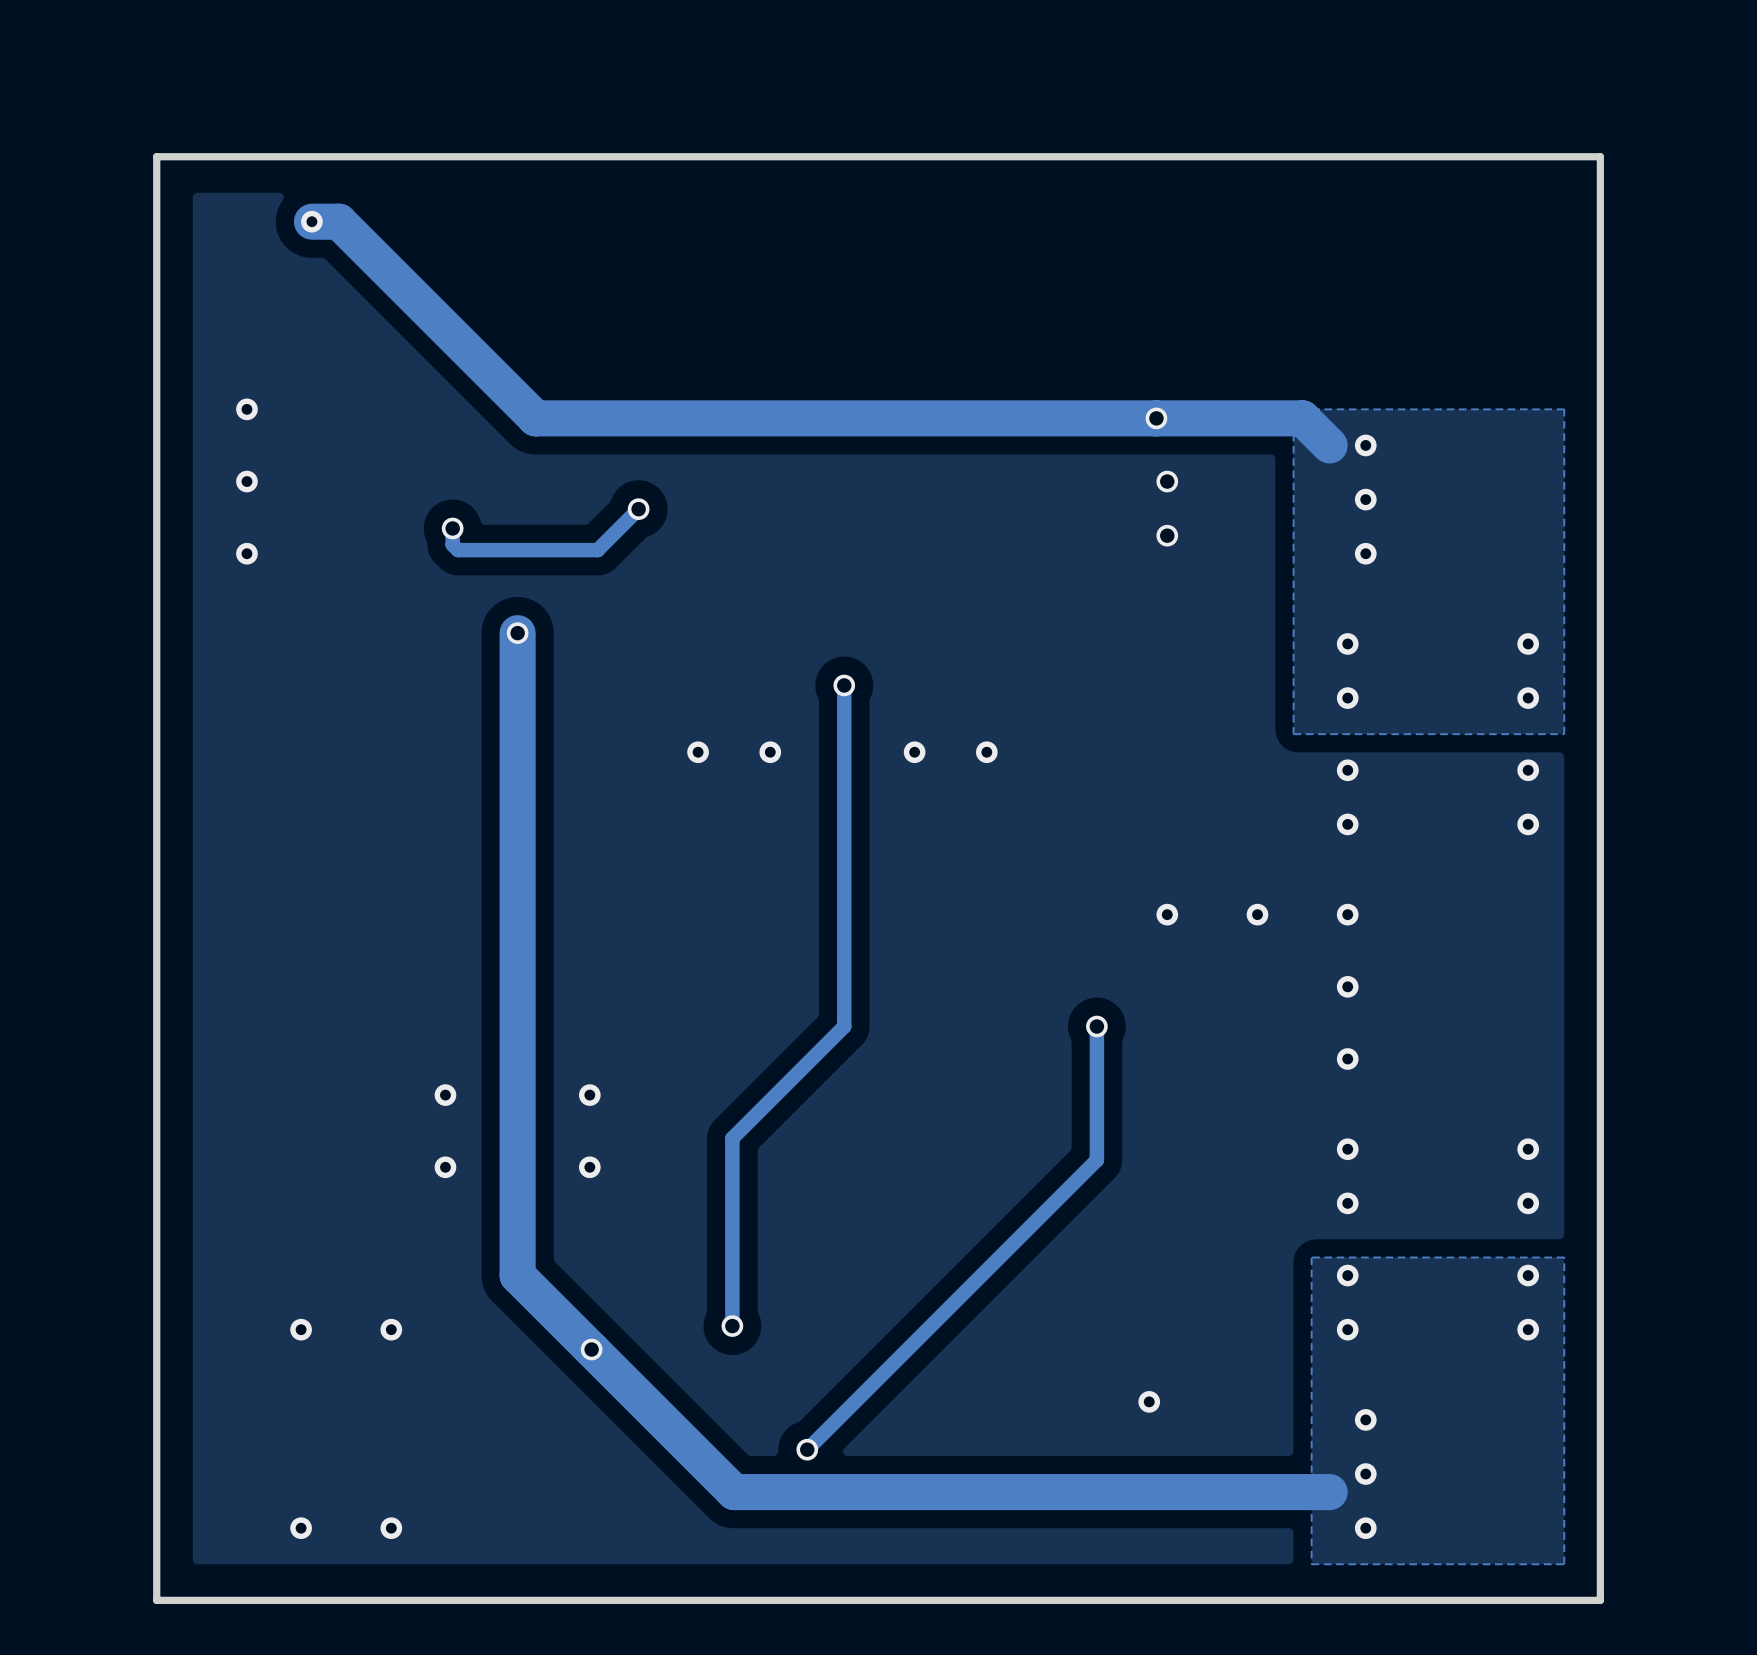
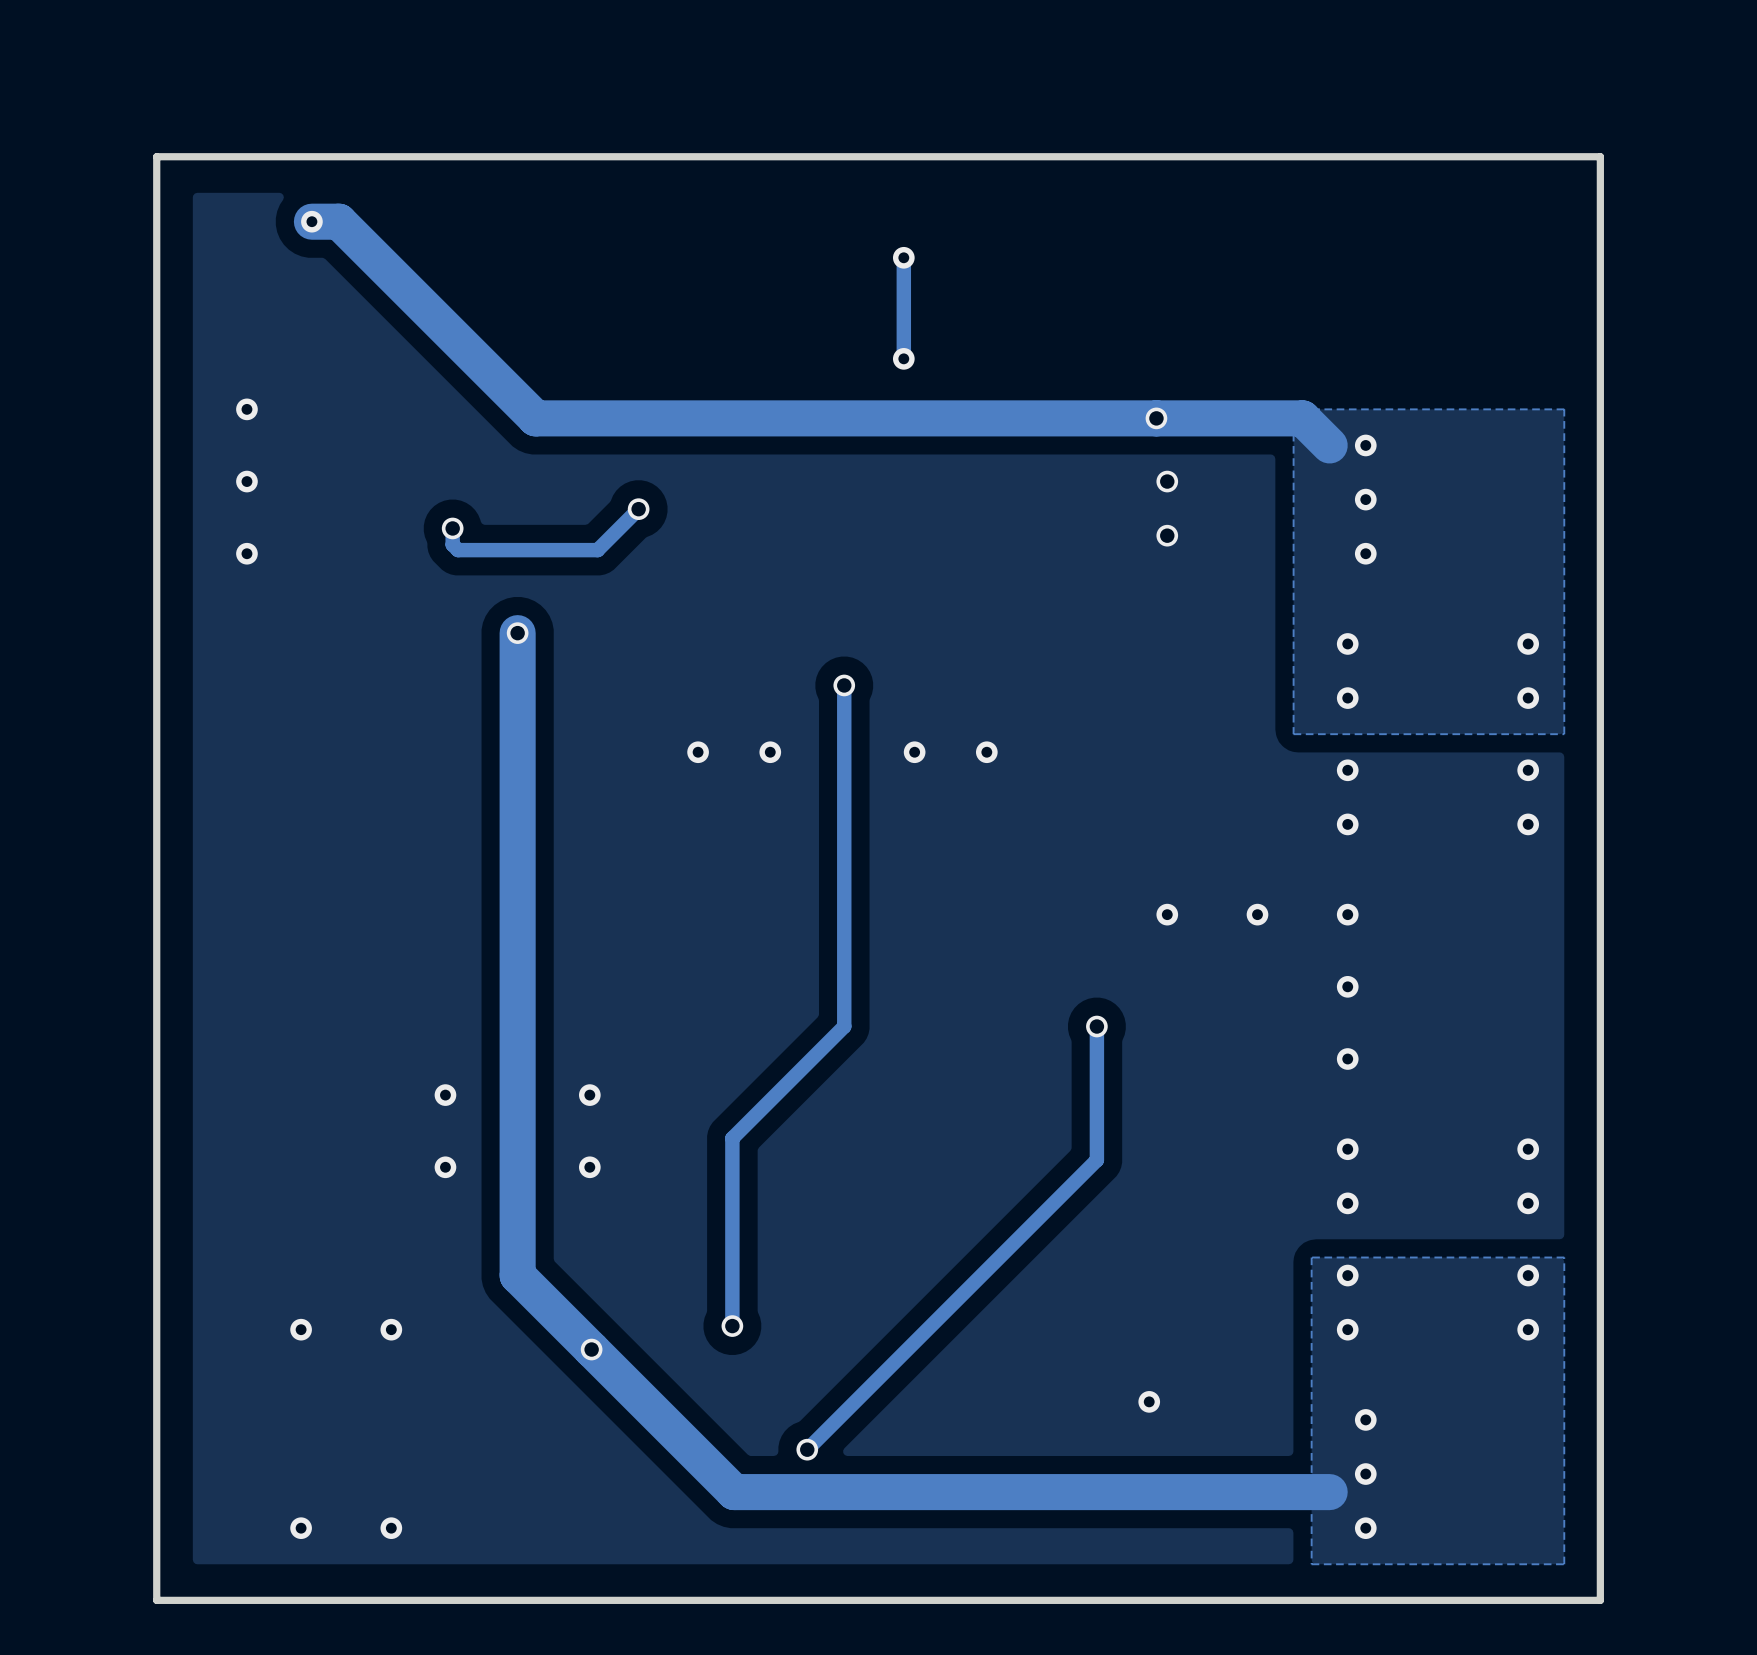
track: none -> (903, 257) (903, 358)
via: none -> (903, 257)
via: none -> (903, 358)

